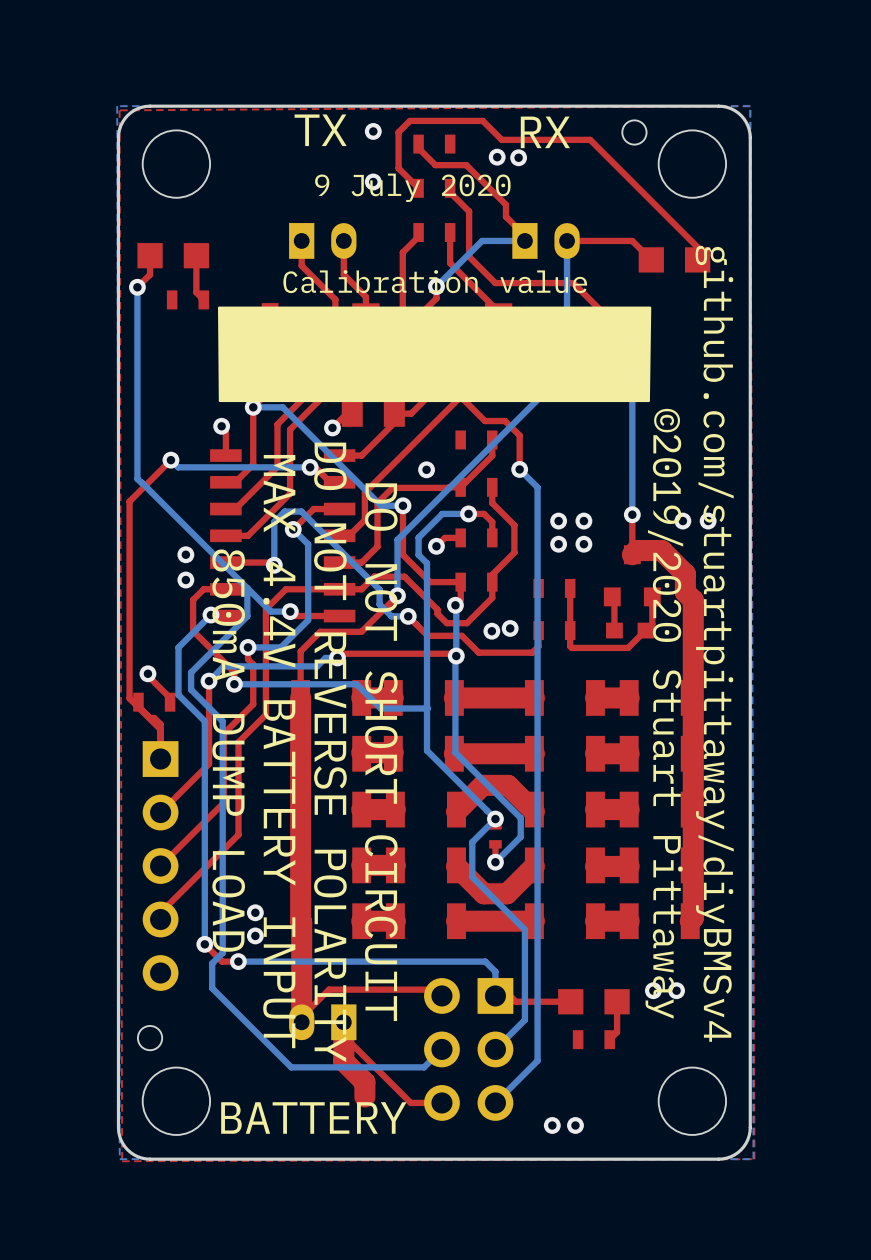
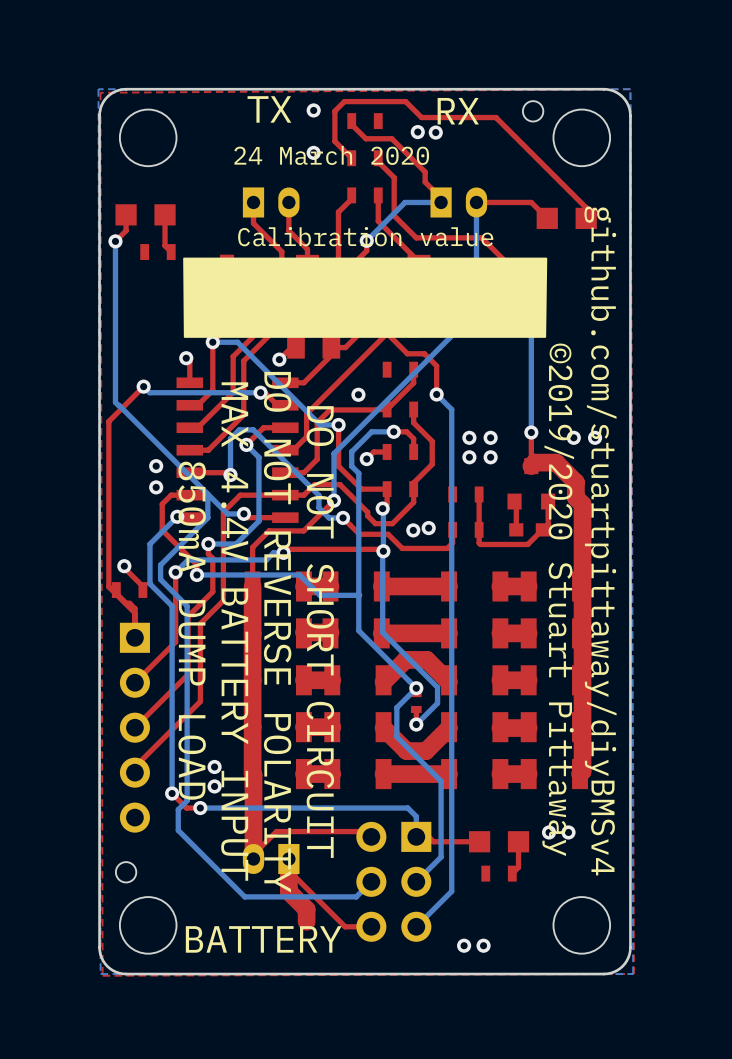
text: 9 July 2020 (412, 187) -> 24 March 2020 (331, 155)

